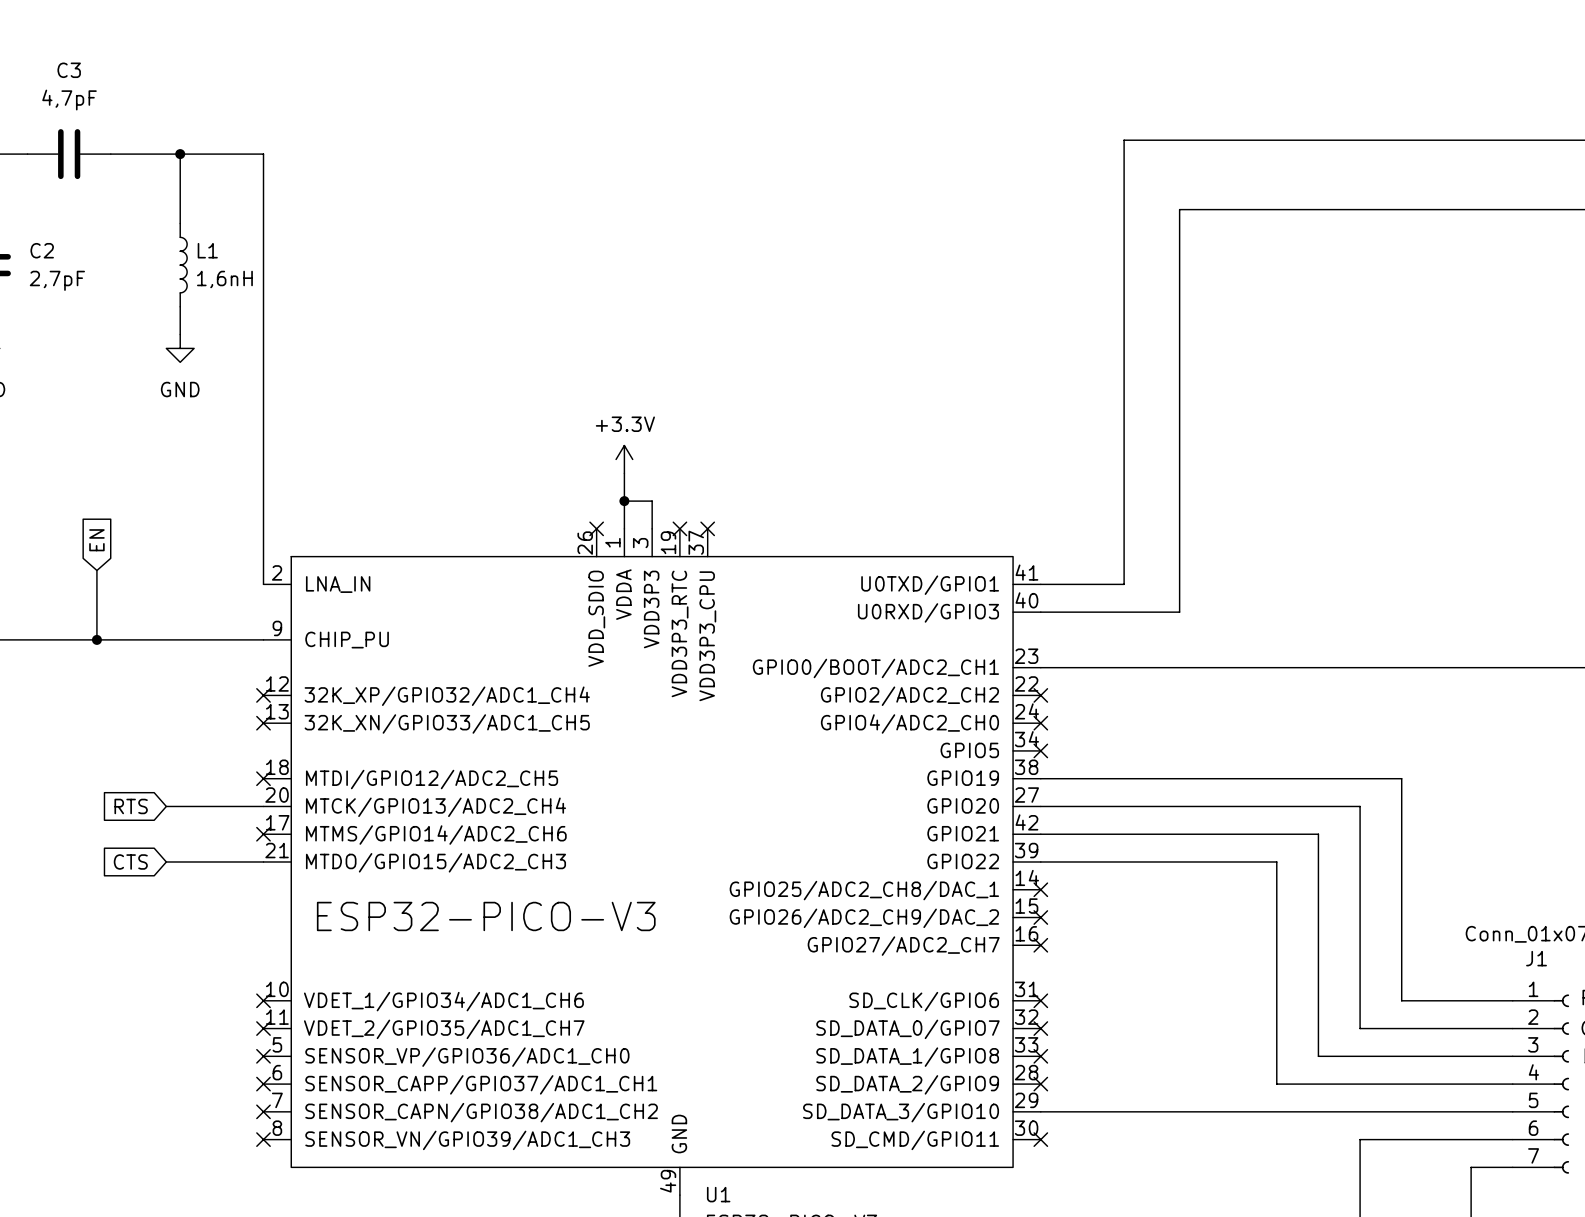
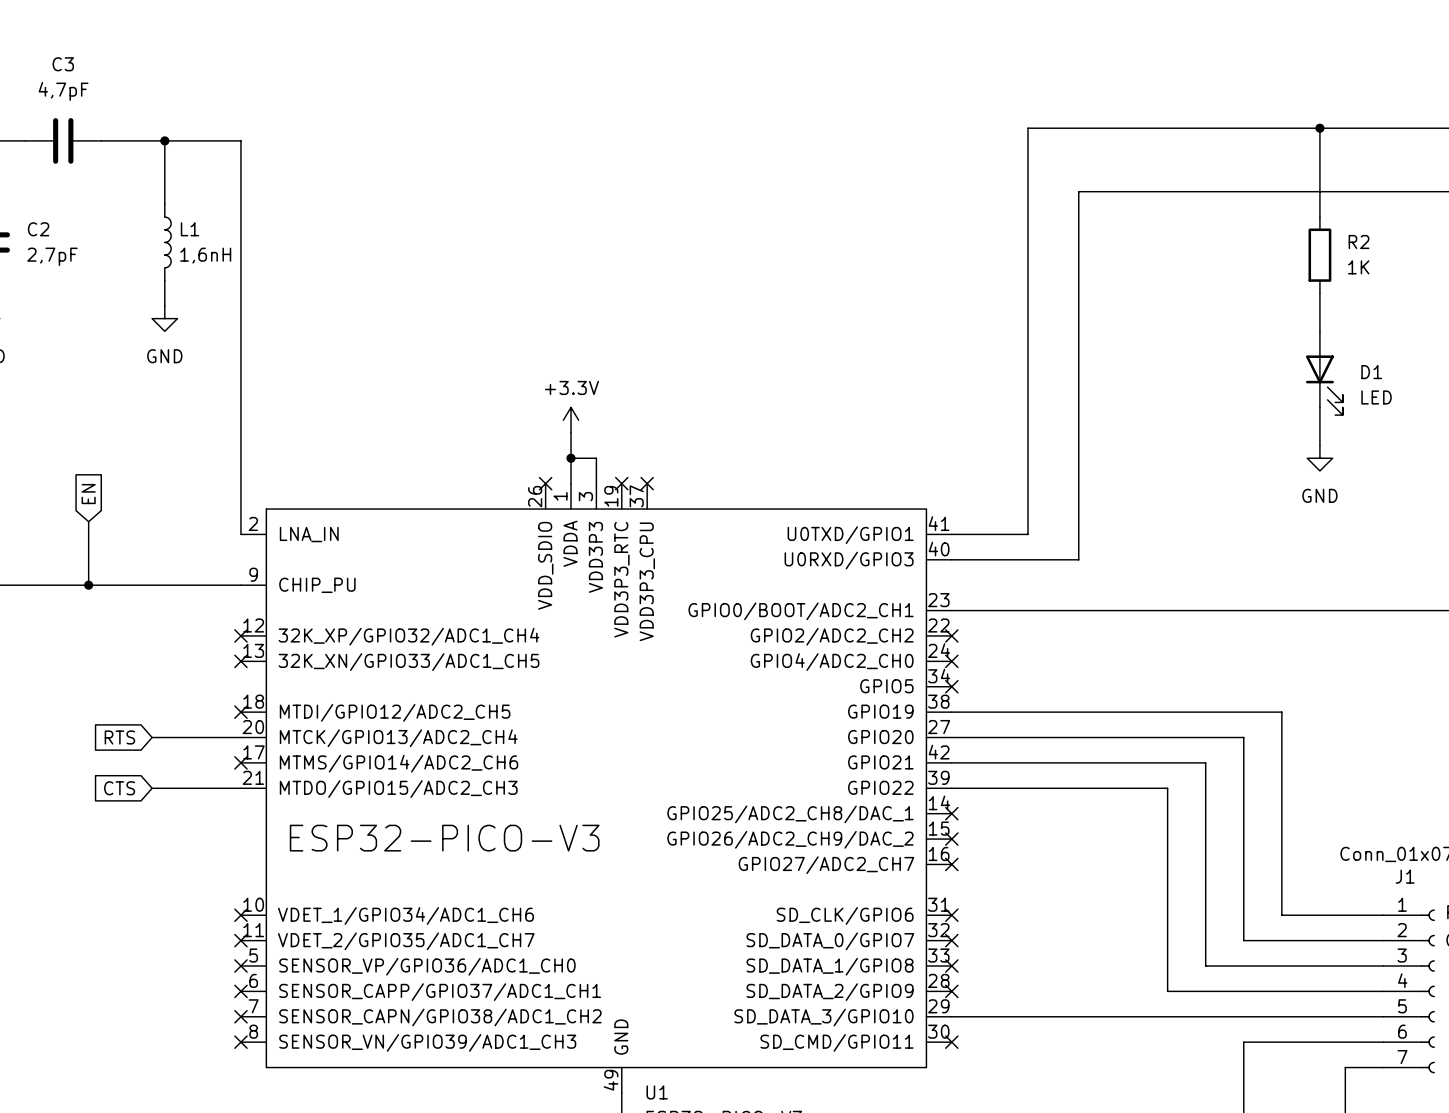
wire: none -> (1319, 128) (1319, 217)
junction: none -> (1319, 128)
R2: none -> 1K (1319, 255)
wire: none -> (1319, 293) (1319, 331)
D1: none -> LED (1324, 373)
wire: none -> (1319, 407) (1319, 445)
power symbol: none -> GND (1319, 458)

